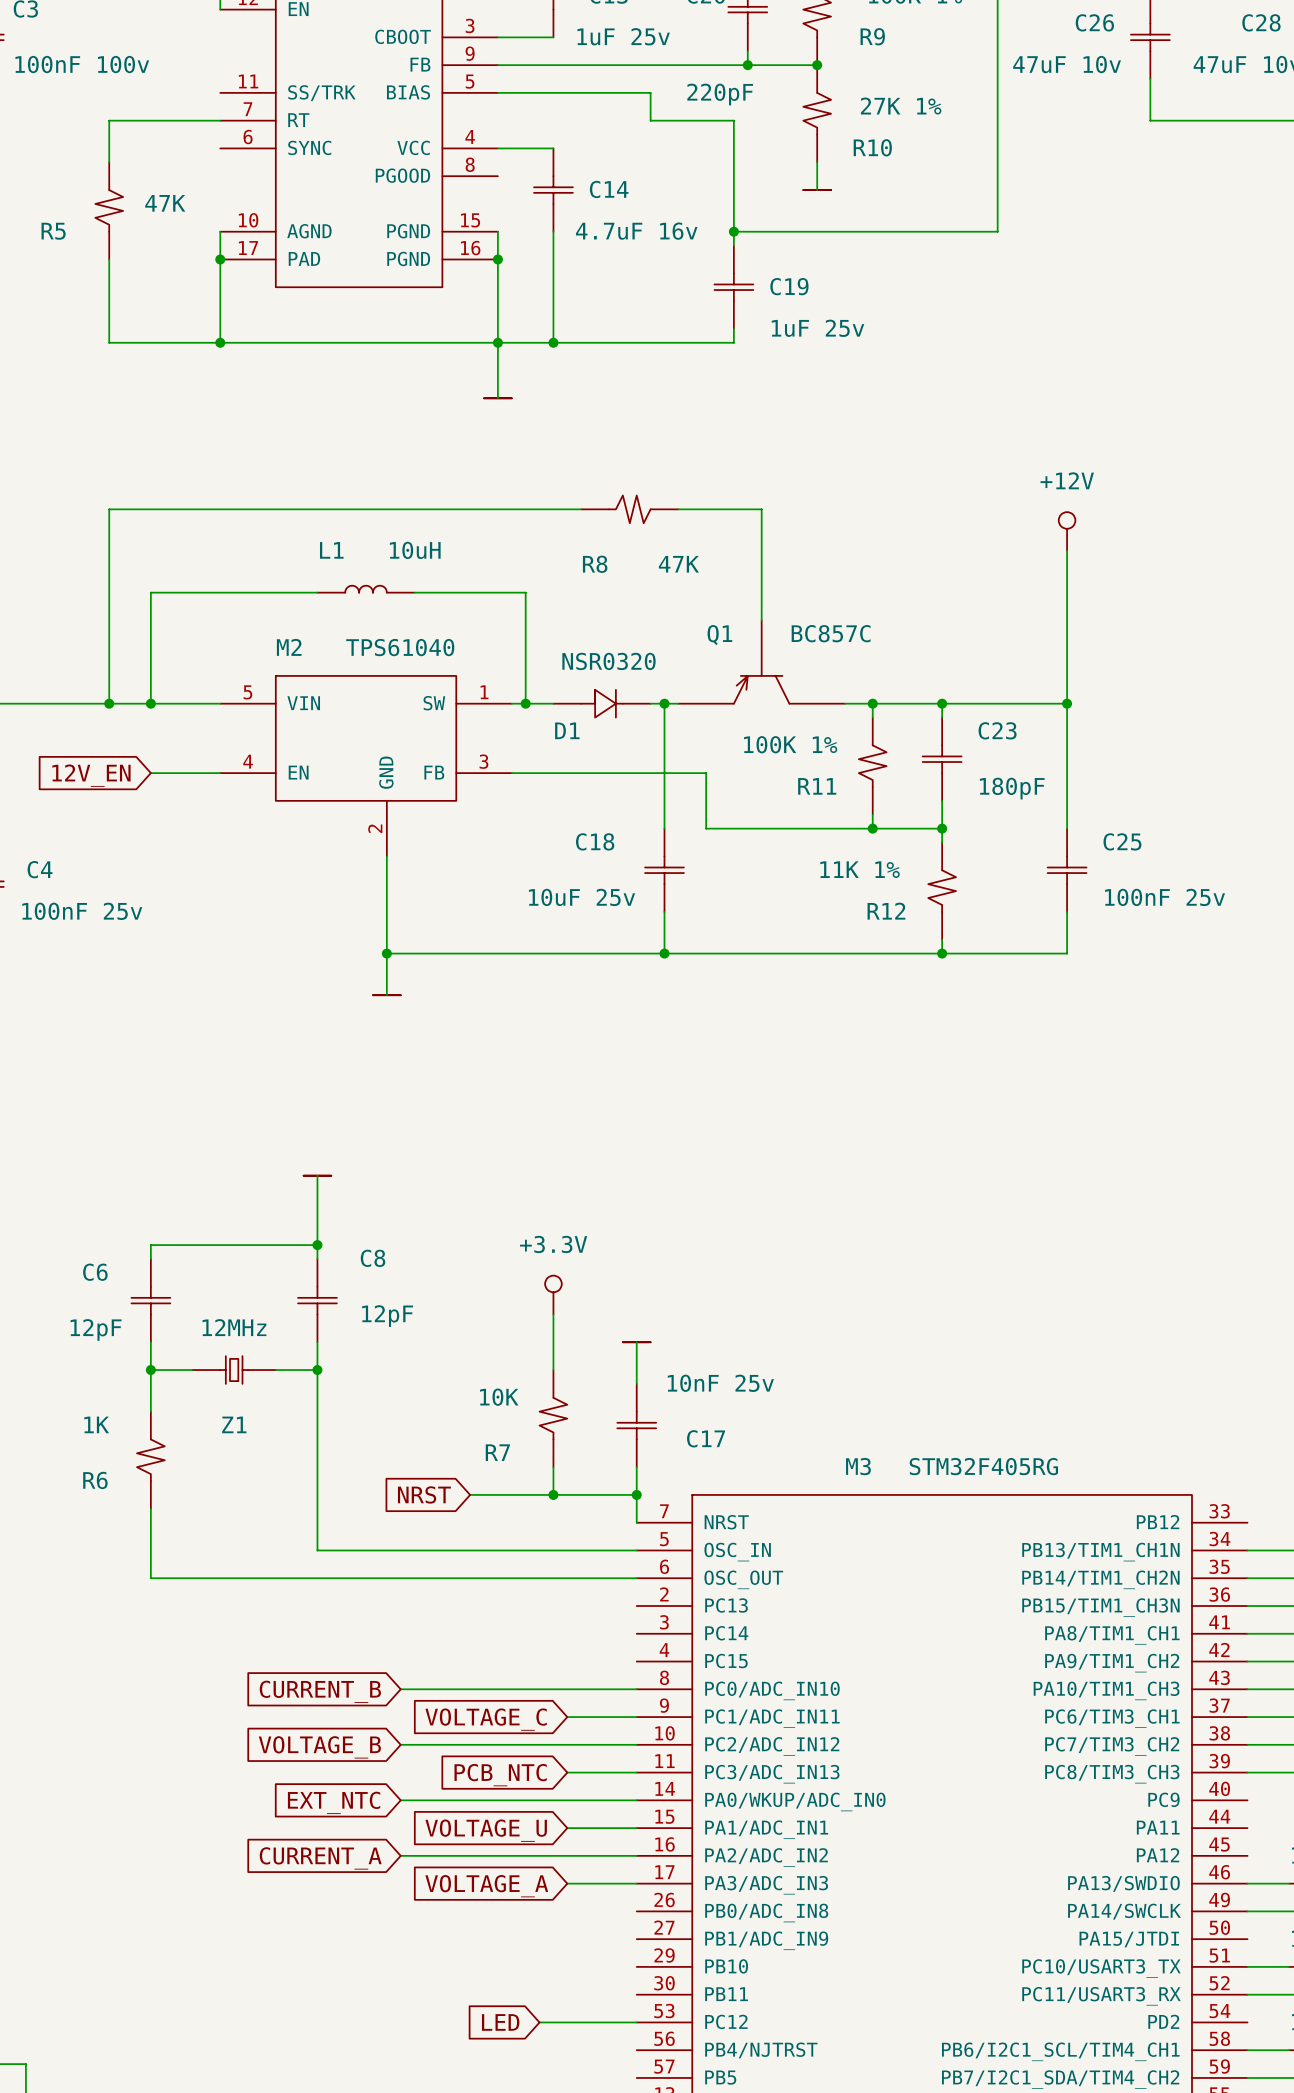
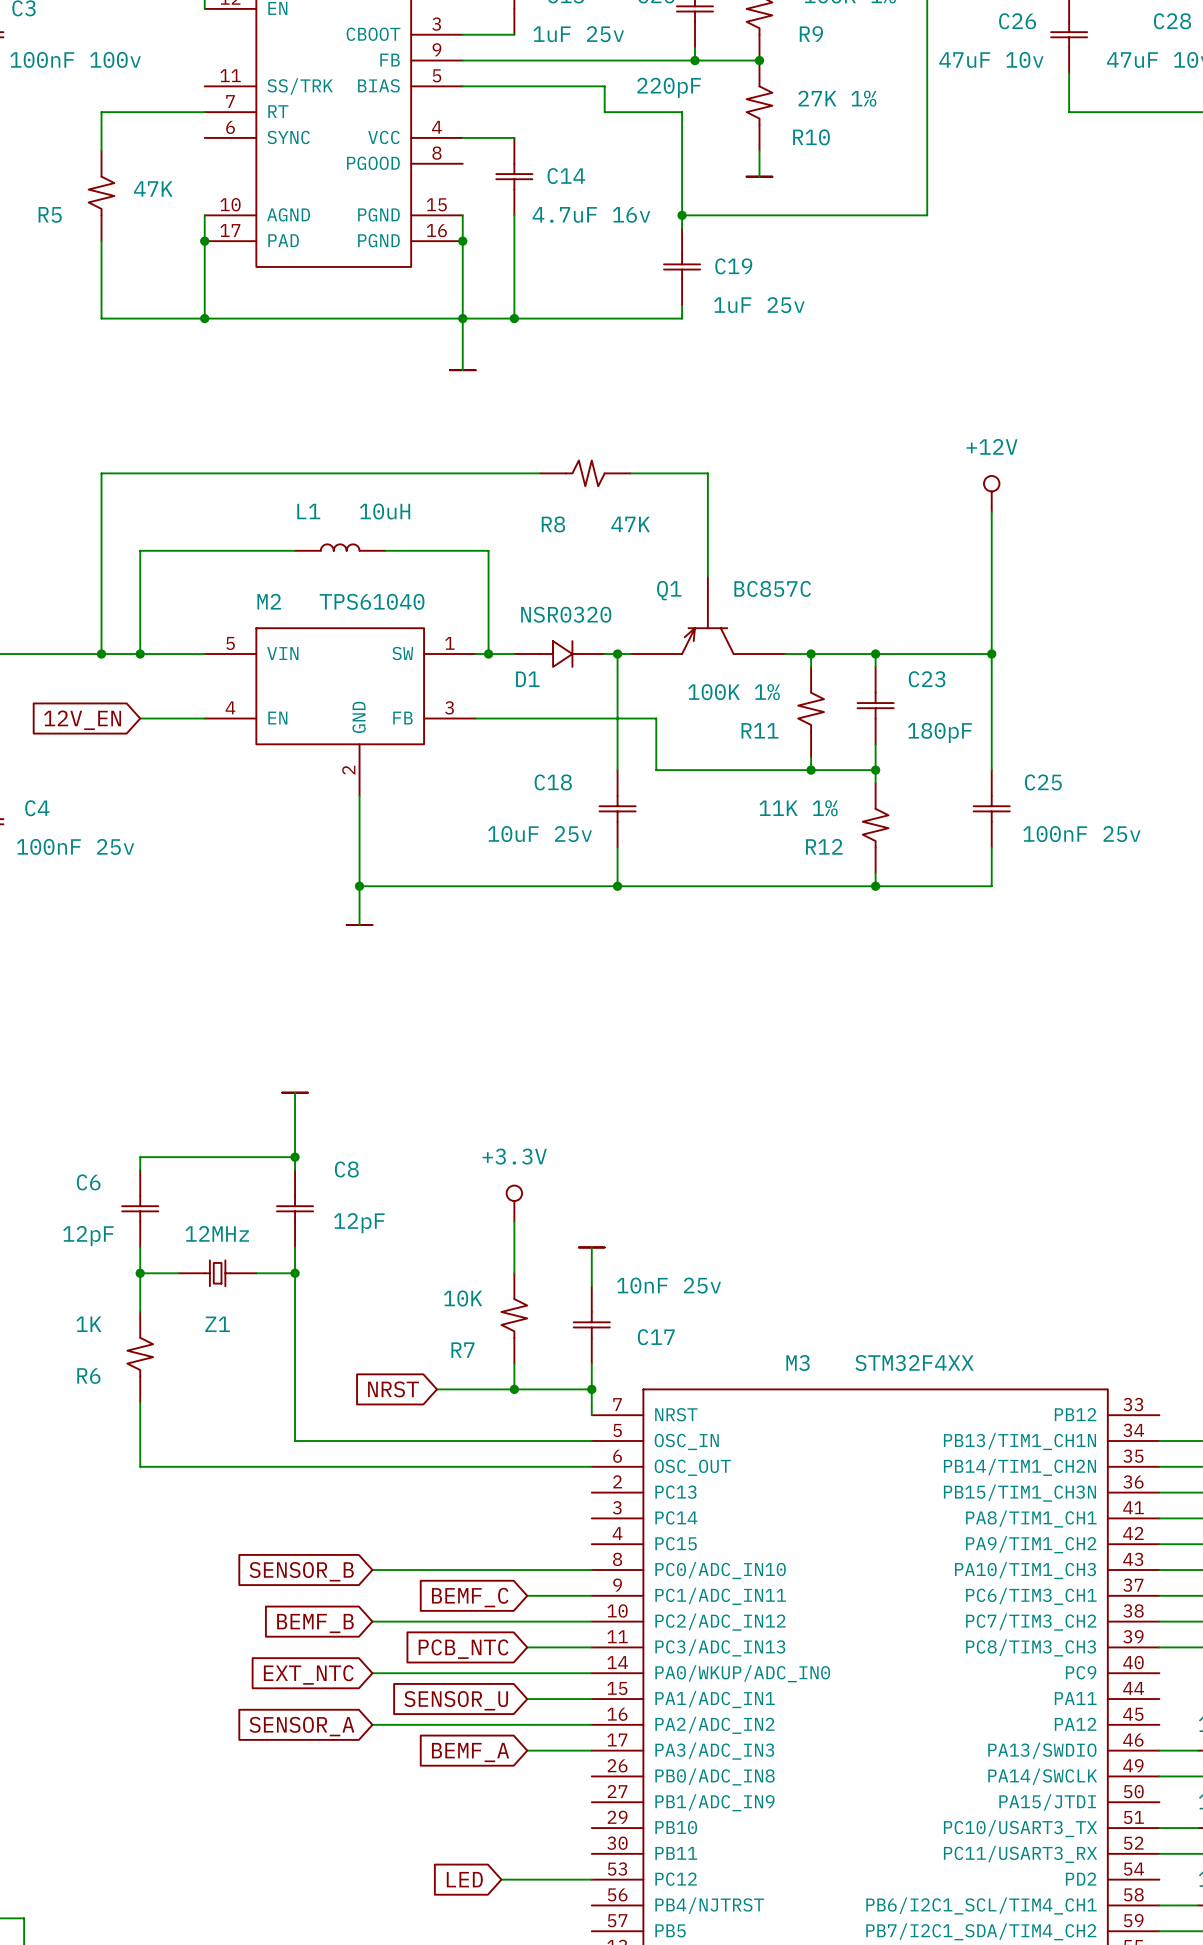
M3 value: STM32F405RG (983, 1466) -> STM32F4XX (914, 1363)
global label: CURRENT_B (320, 1691) -> SENSOR_B (301, 1571)
global label: VOLTAGE_C (486, 1719) -> BEMF_C (470, 1597)
global label: VOLTAGE_B (319, 1747) -> BEMF_B (315, 1623)
global label: VOLTAGE_U (486, 1830) -> SENSOR_U (456, 1700)
global label: CURRENT_A (320, 1858) -> SENSOR_A (301, 1726)
global label: VOLTAGE_A (486, 1886) -> BEMF_A (470, 1752)

